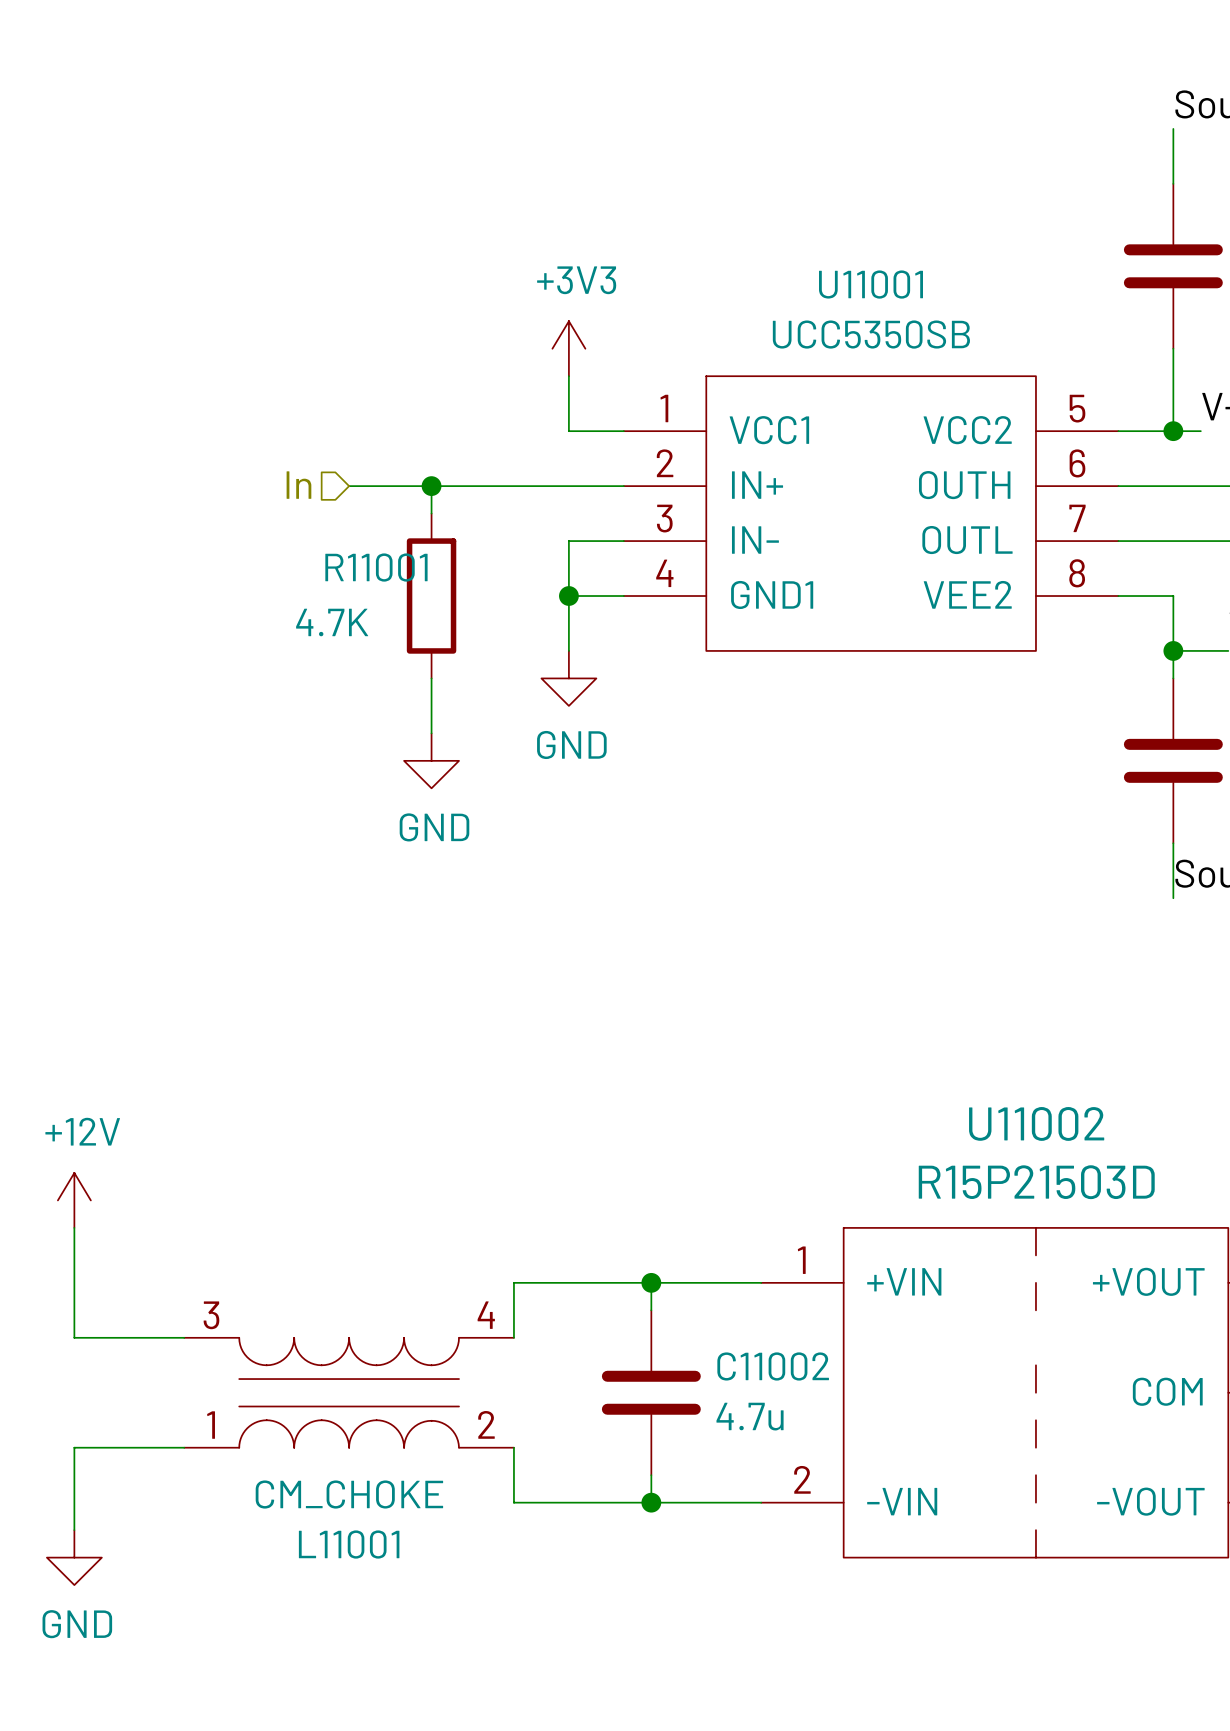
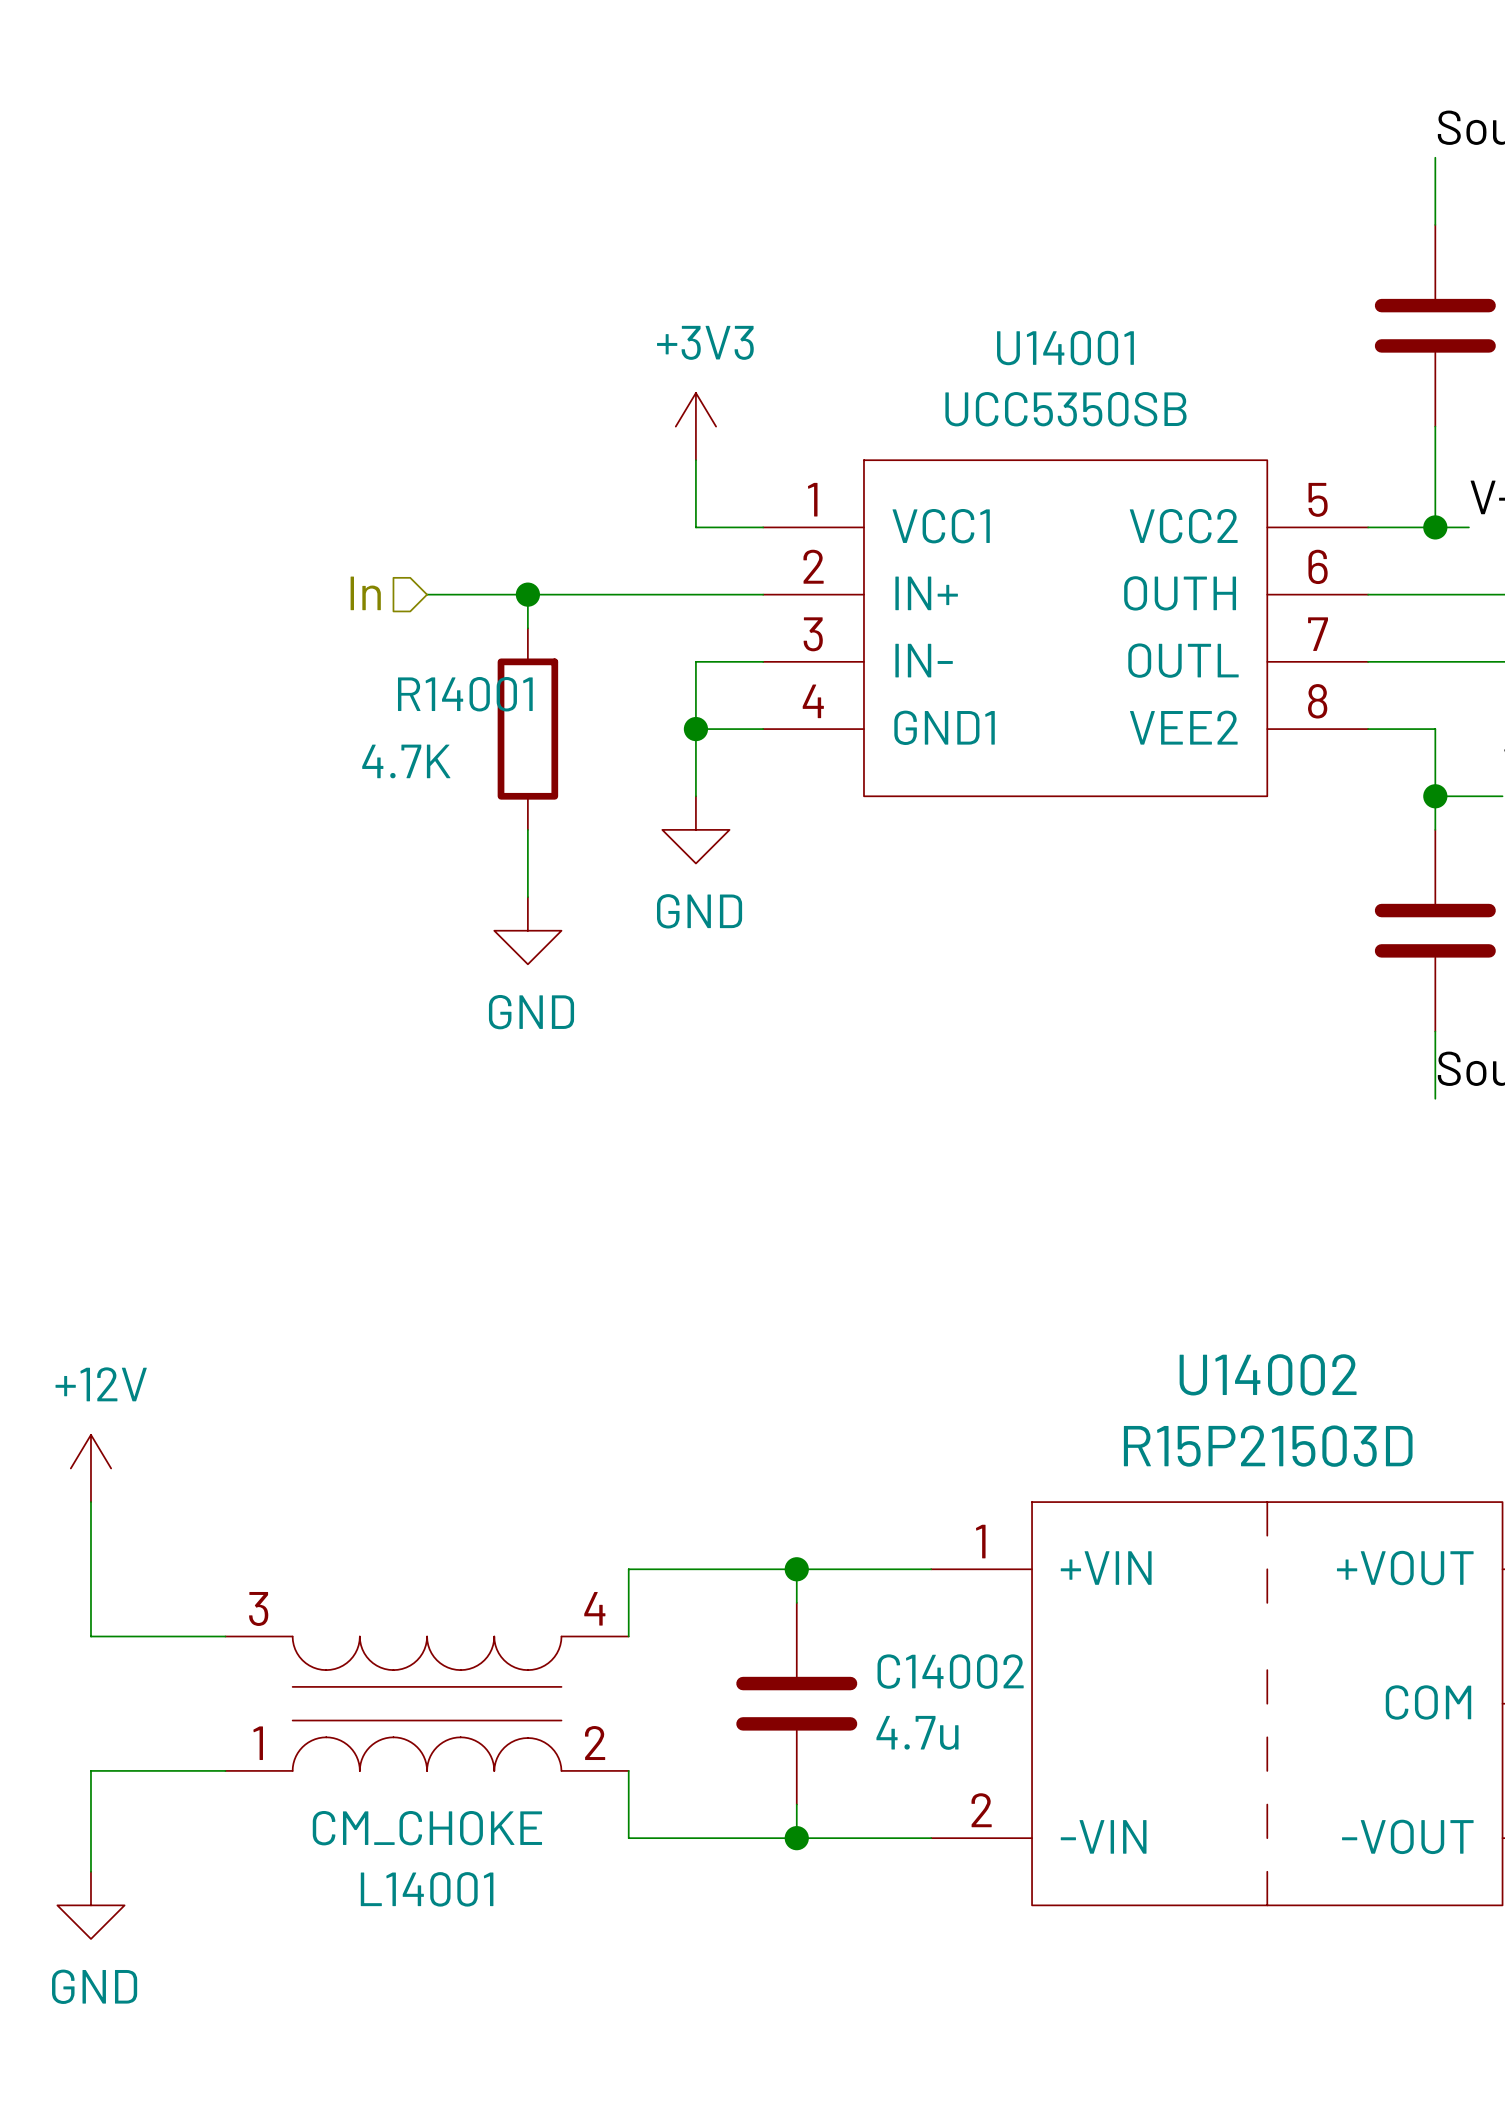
U11001 name: U11001 (871, 284) -> U14001 (1065, 348)
R11001 name: R11001 (376, 567) -> R14001 (465, 694)
U11002 name: U11002 (1036, 1123) -> U14002 (1268, 1374)
C11002 name: C11002 (773, 1366) -> C14002 (950, 1671)
L11001 name: L11001 (349, 1544) -> L14001 (427, 1889)

